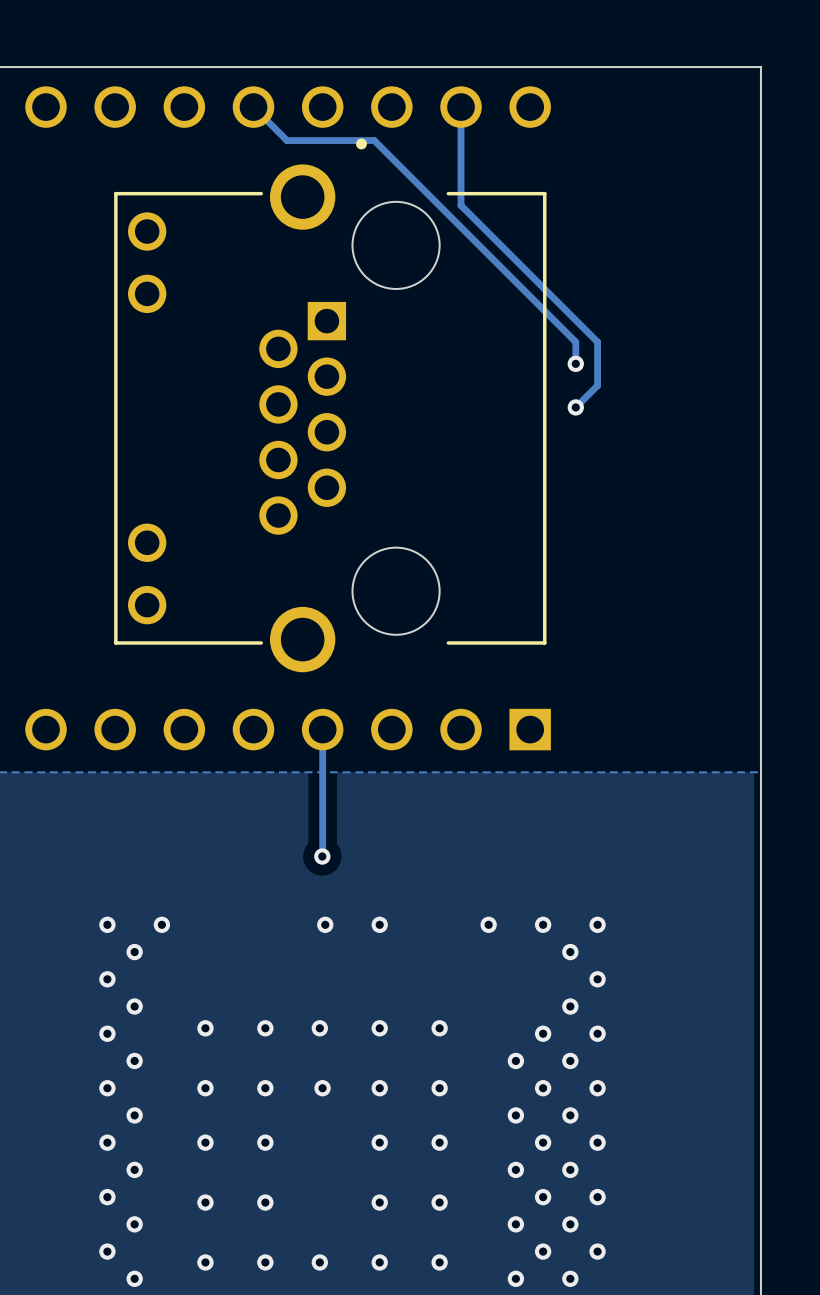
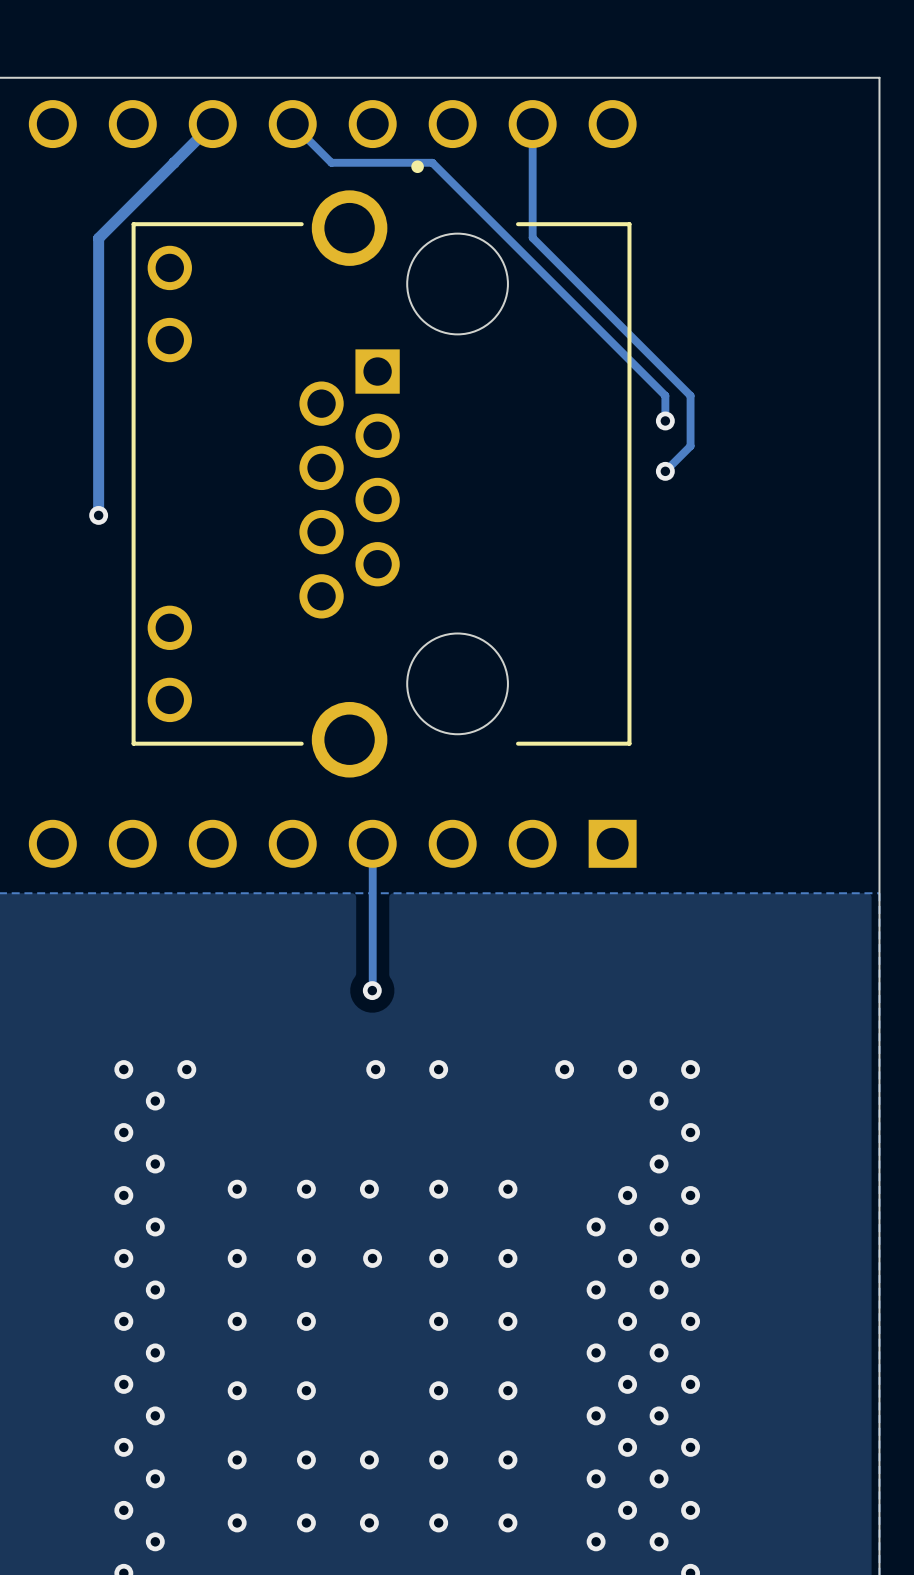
track: none -> (212, 124) (98, 238) (98, 515)
via: none -> (98, 515)

